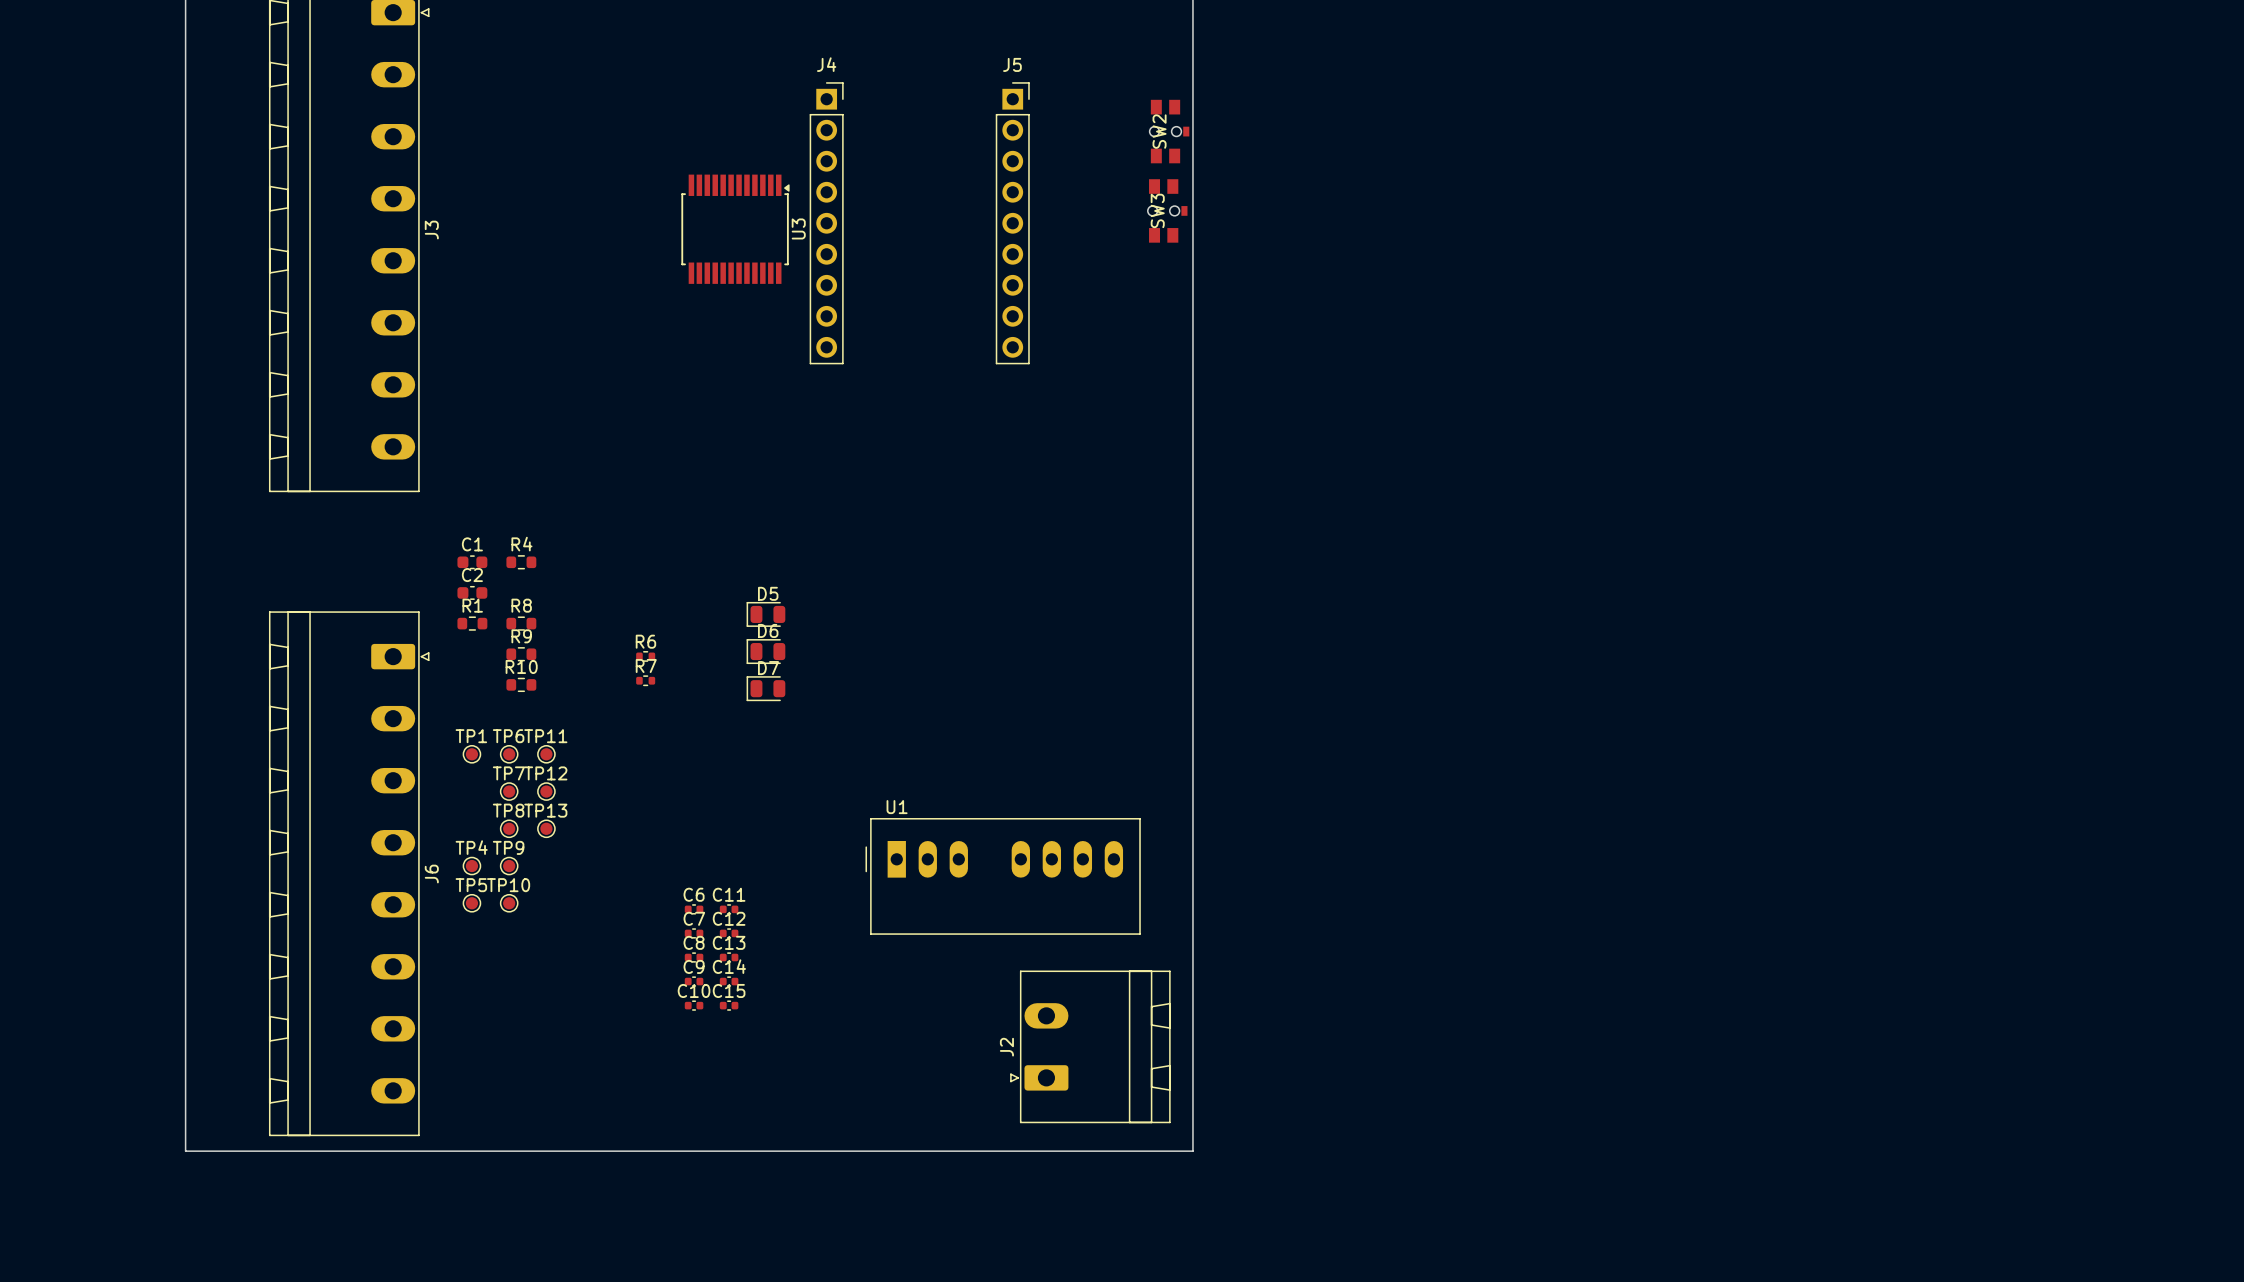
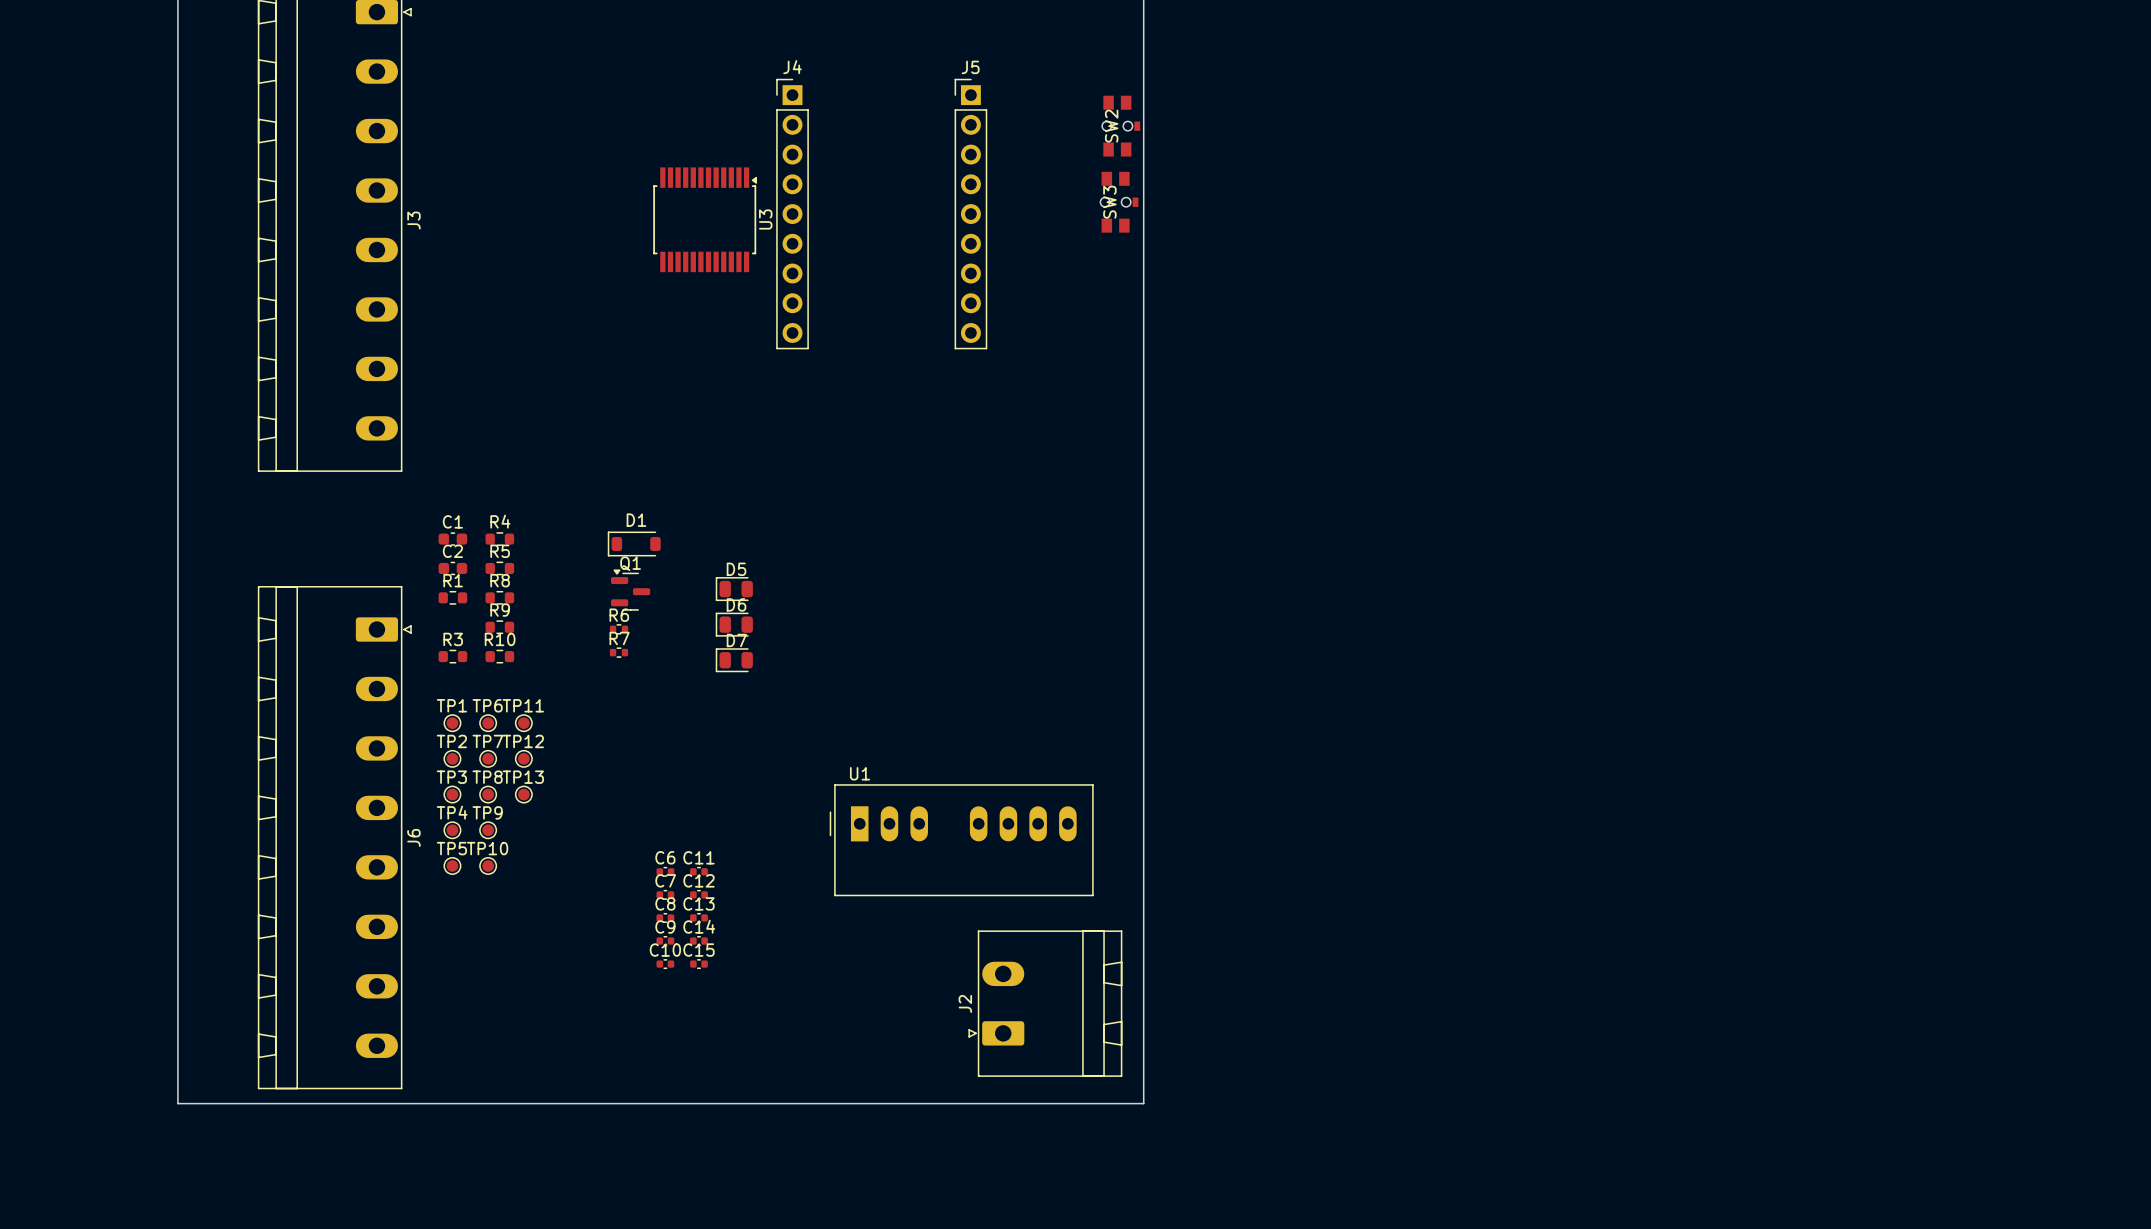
J4 footprint: [809, 82, 844, 365] -> [776, 78, 809, 350]
J5 footprint: [995, 82, 1030, 365] -> [954, 78, 988, 350]
D1: none -> (634, 543)
R5: none -> (499, 568)
Q1: none -> (630, 590)
R3: none -> (452, 656)
TP2: none -> (452, 758)
TP3: none -> (452, 794)

